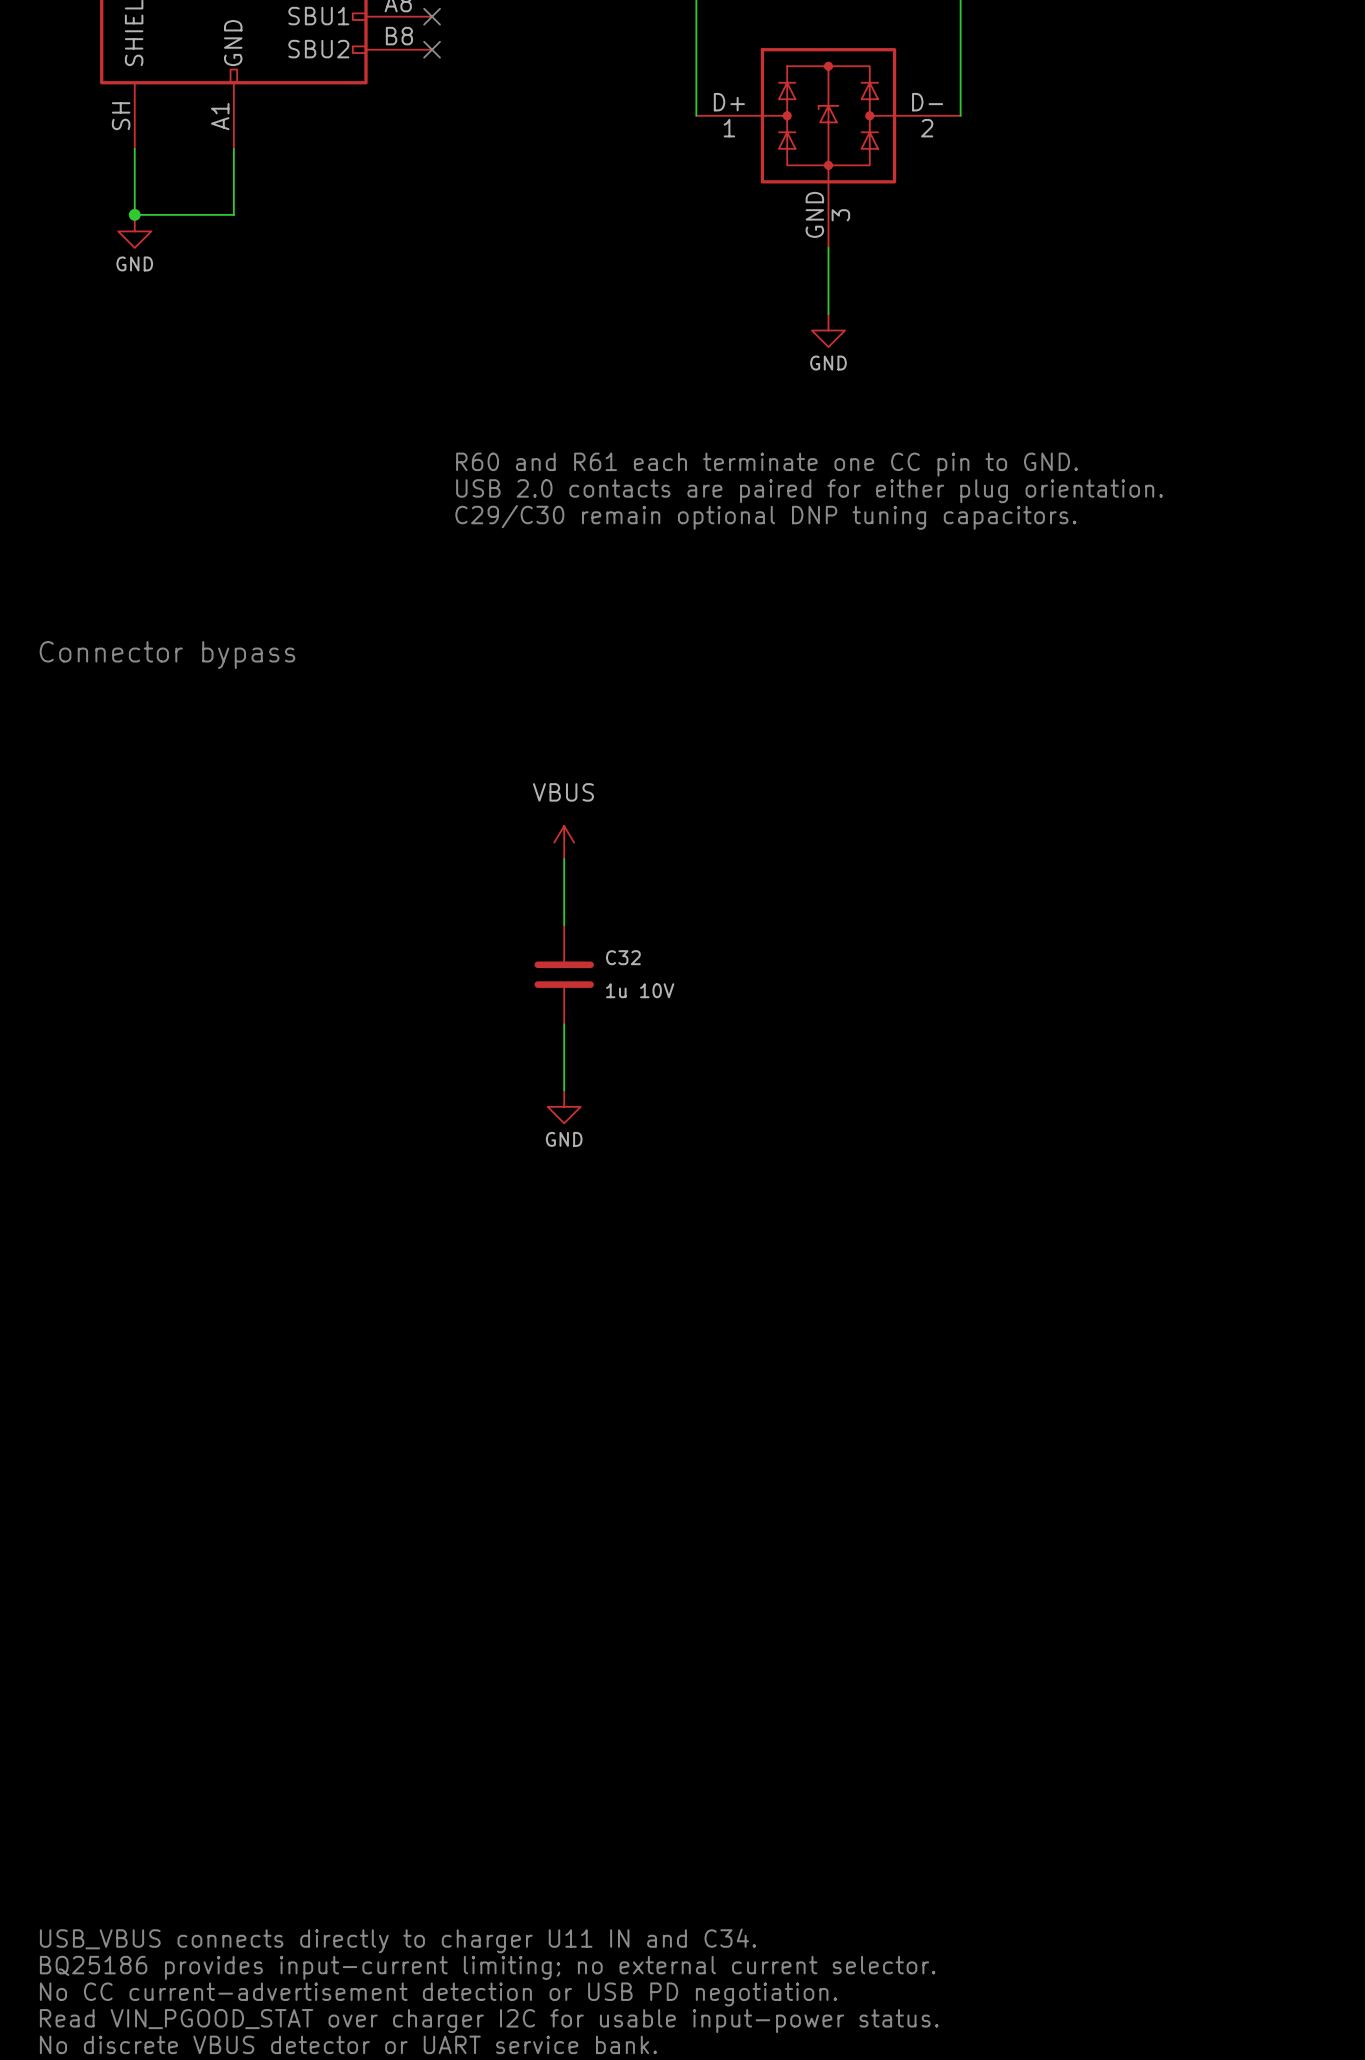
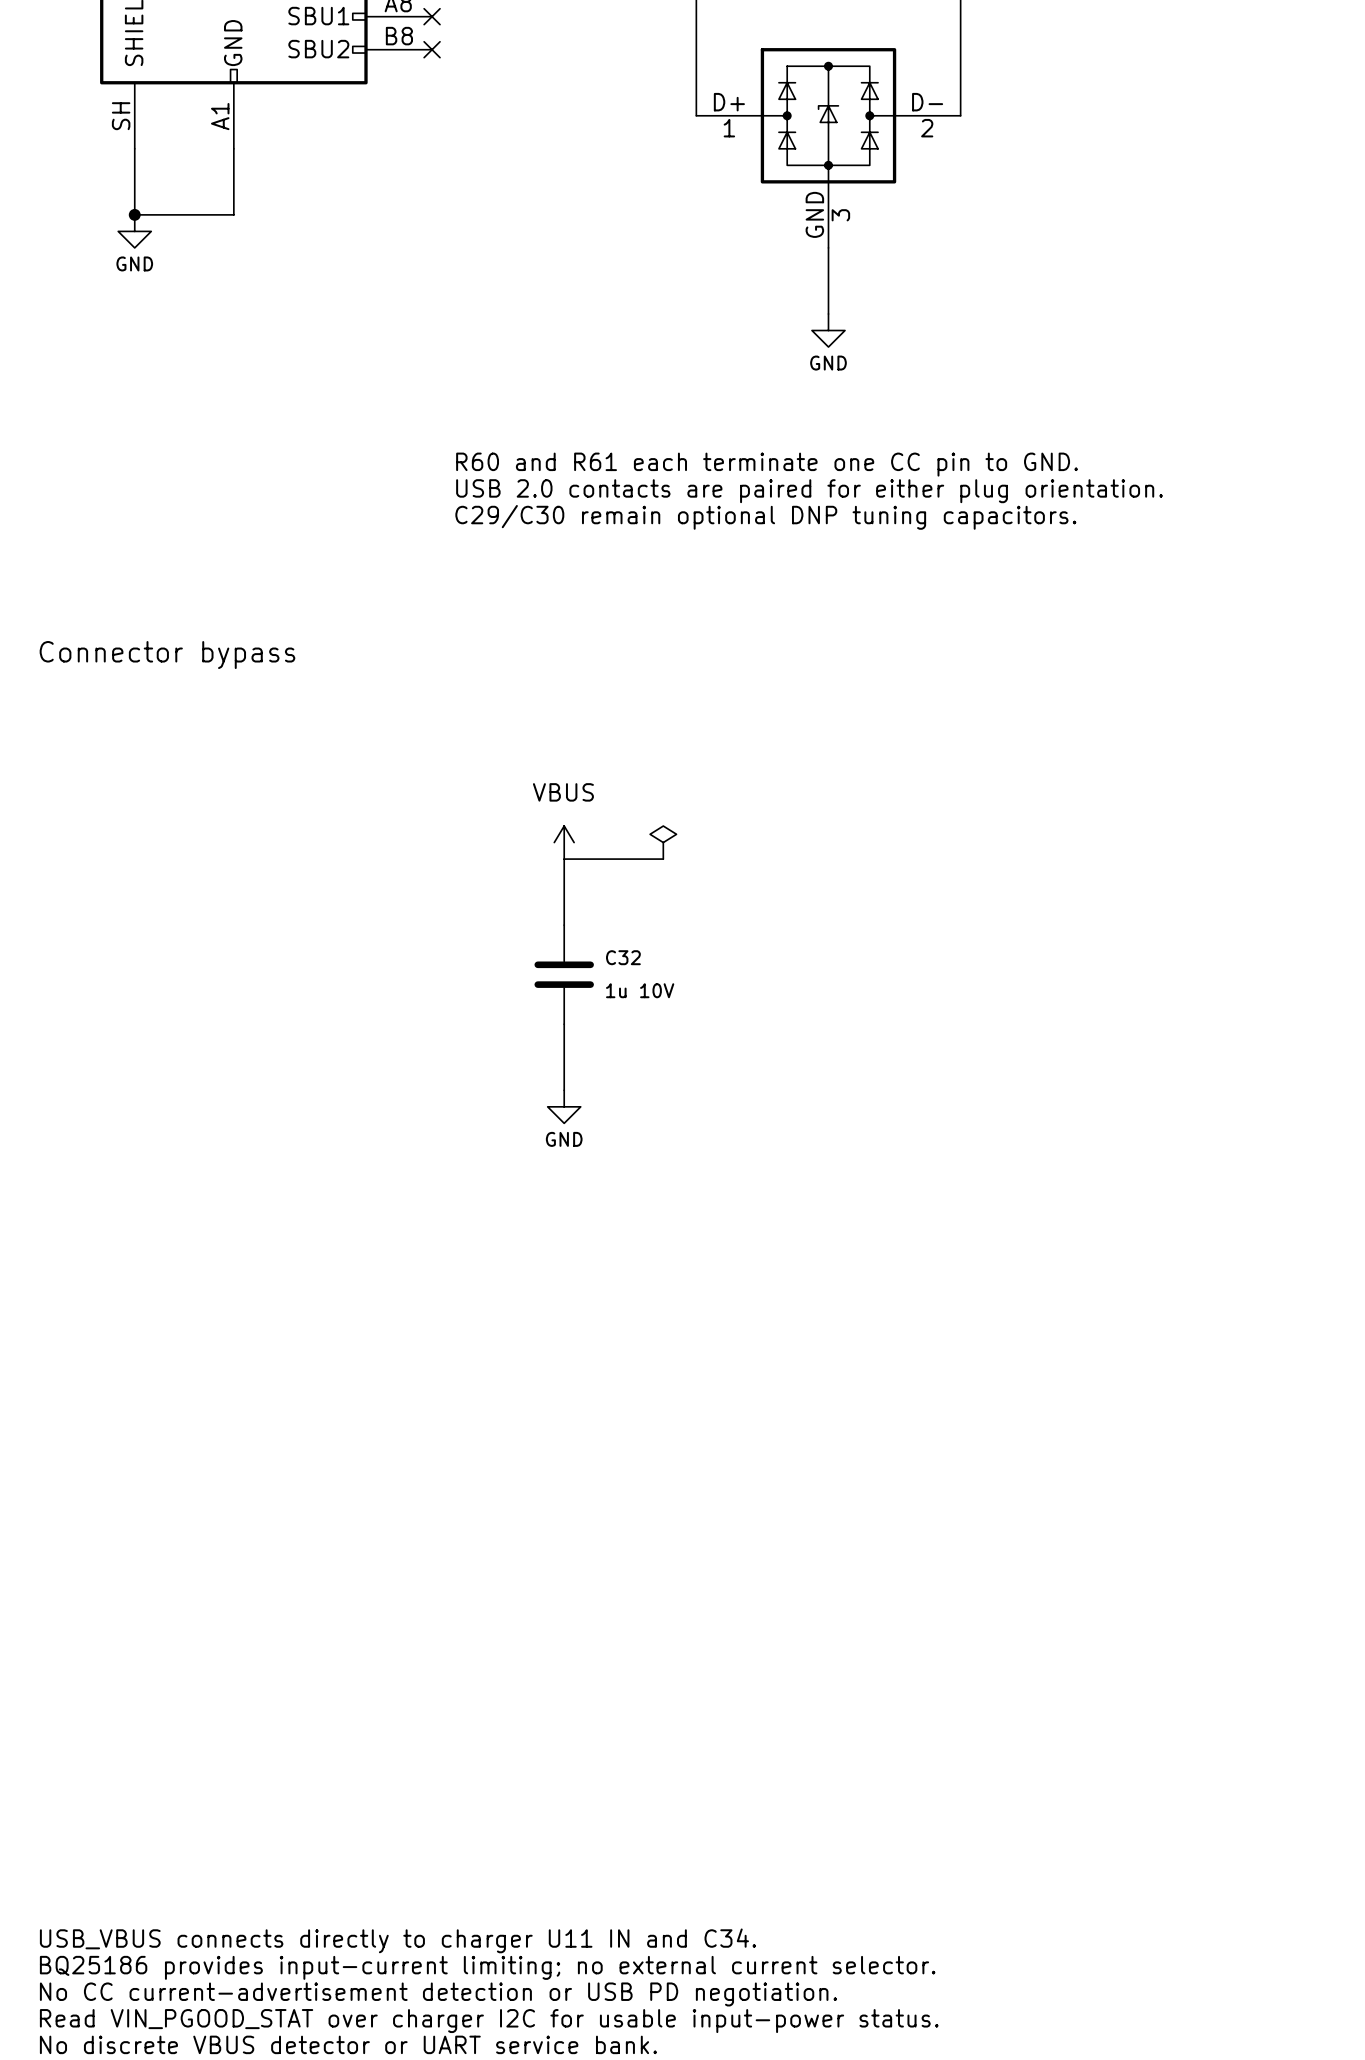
power symbol: none -> (663, 842)
wire: none -> (564, 859) (663, 859)

